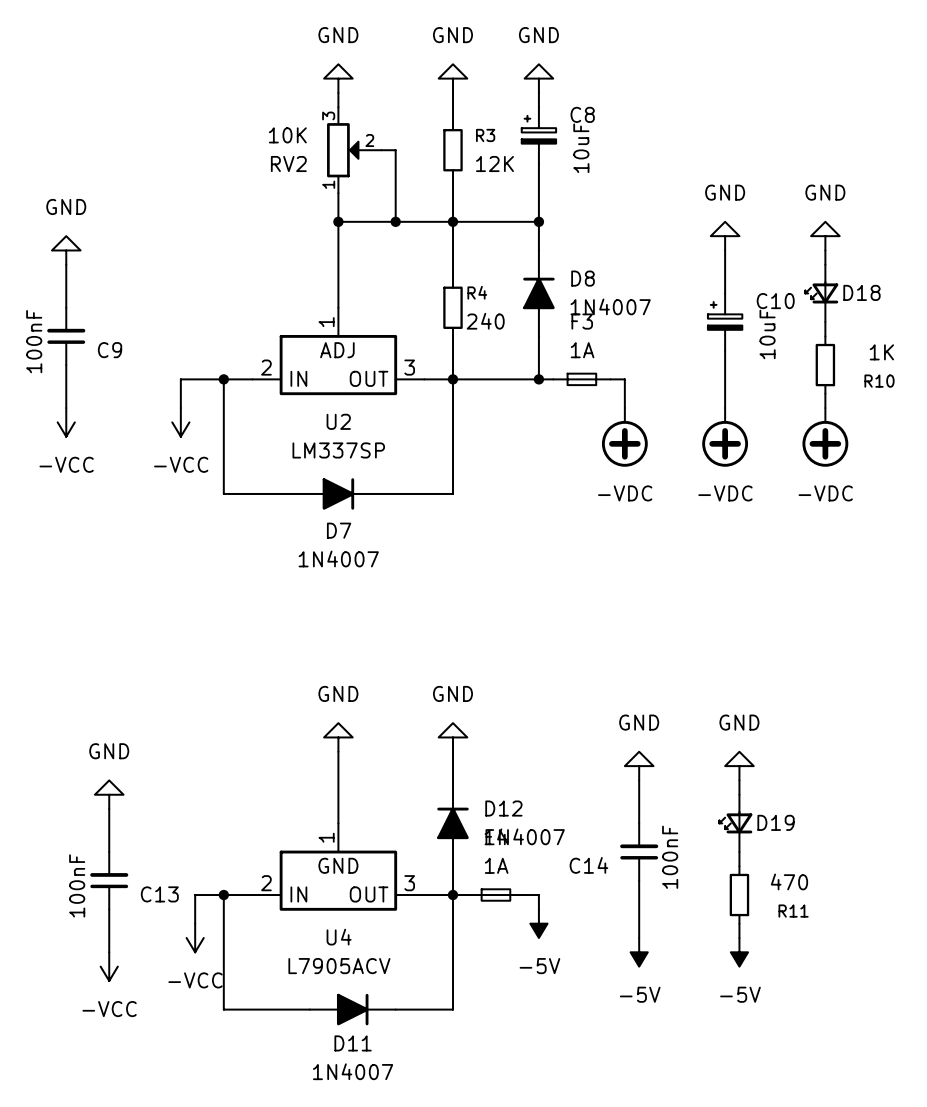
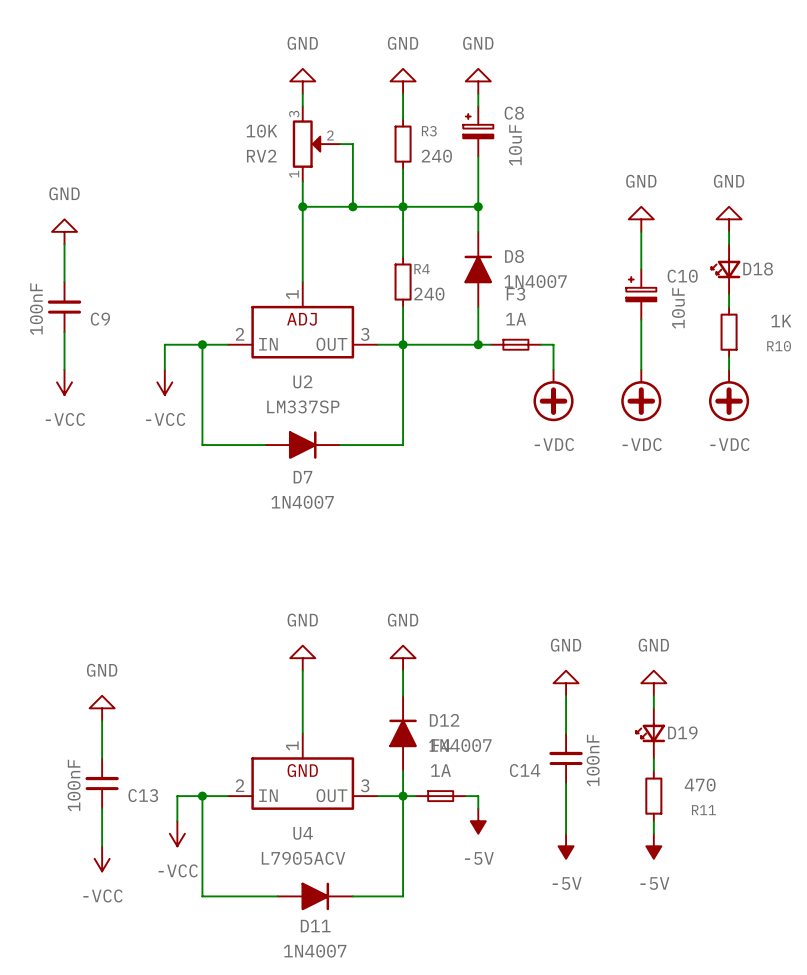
R3 value: 12K (494, 164) -> 240 (436, 156)

